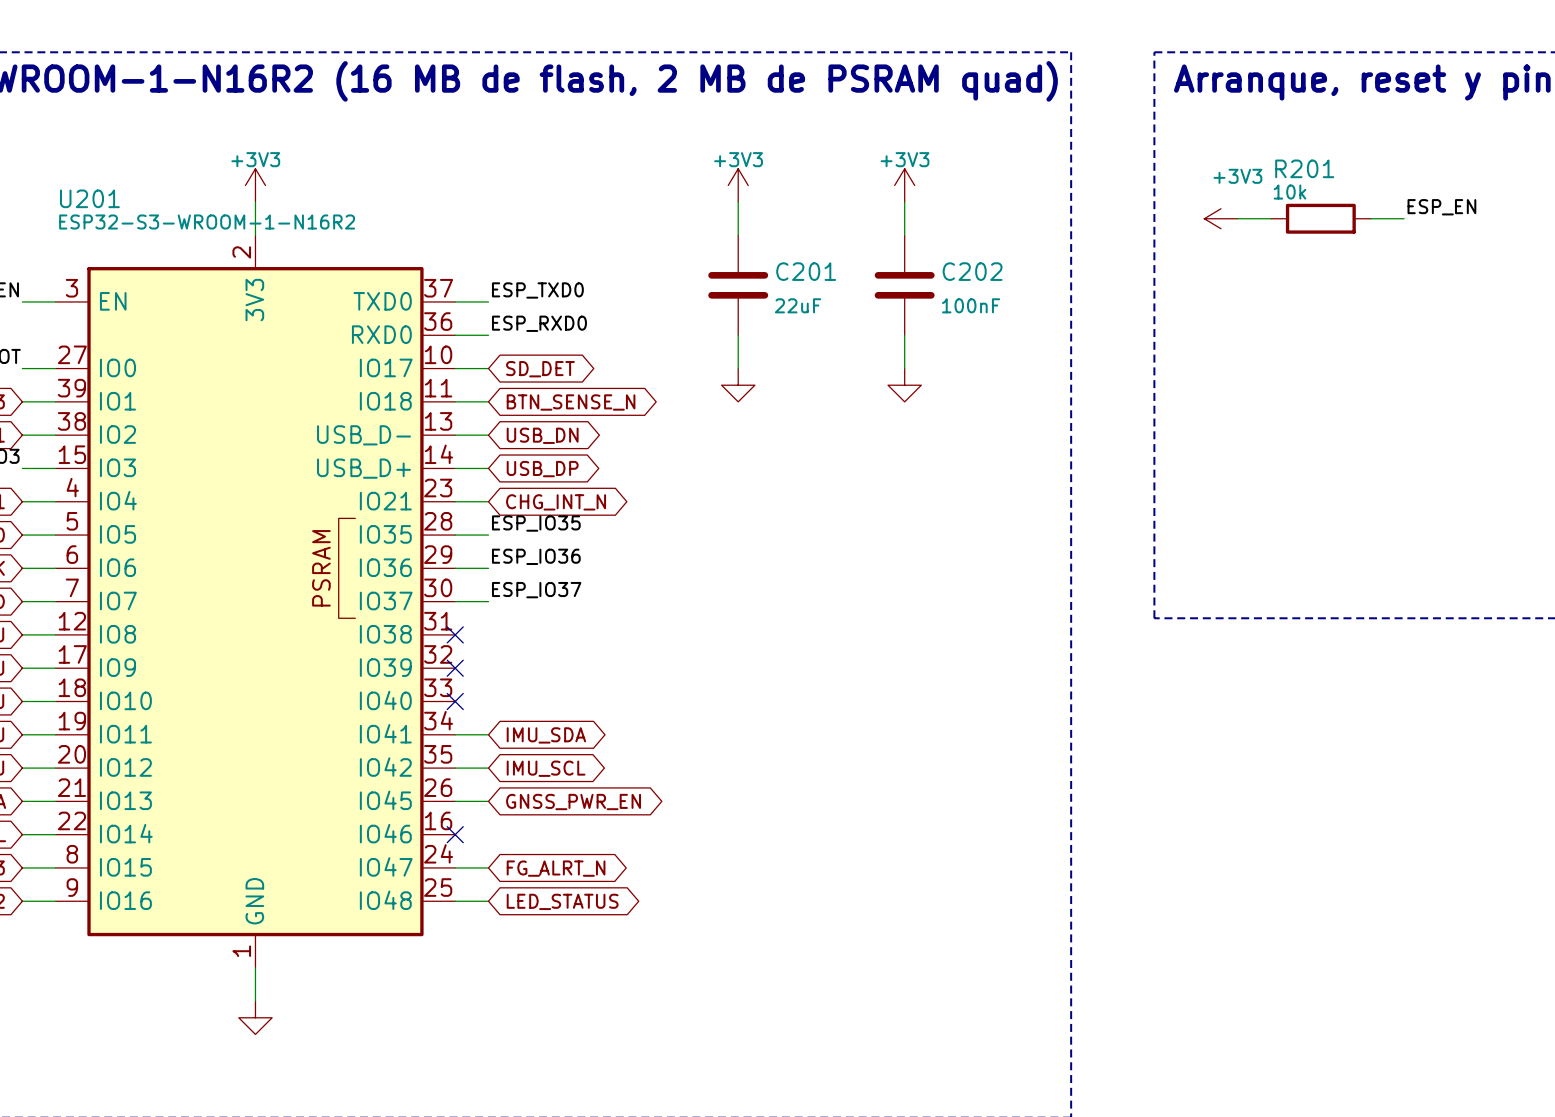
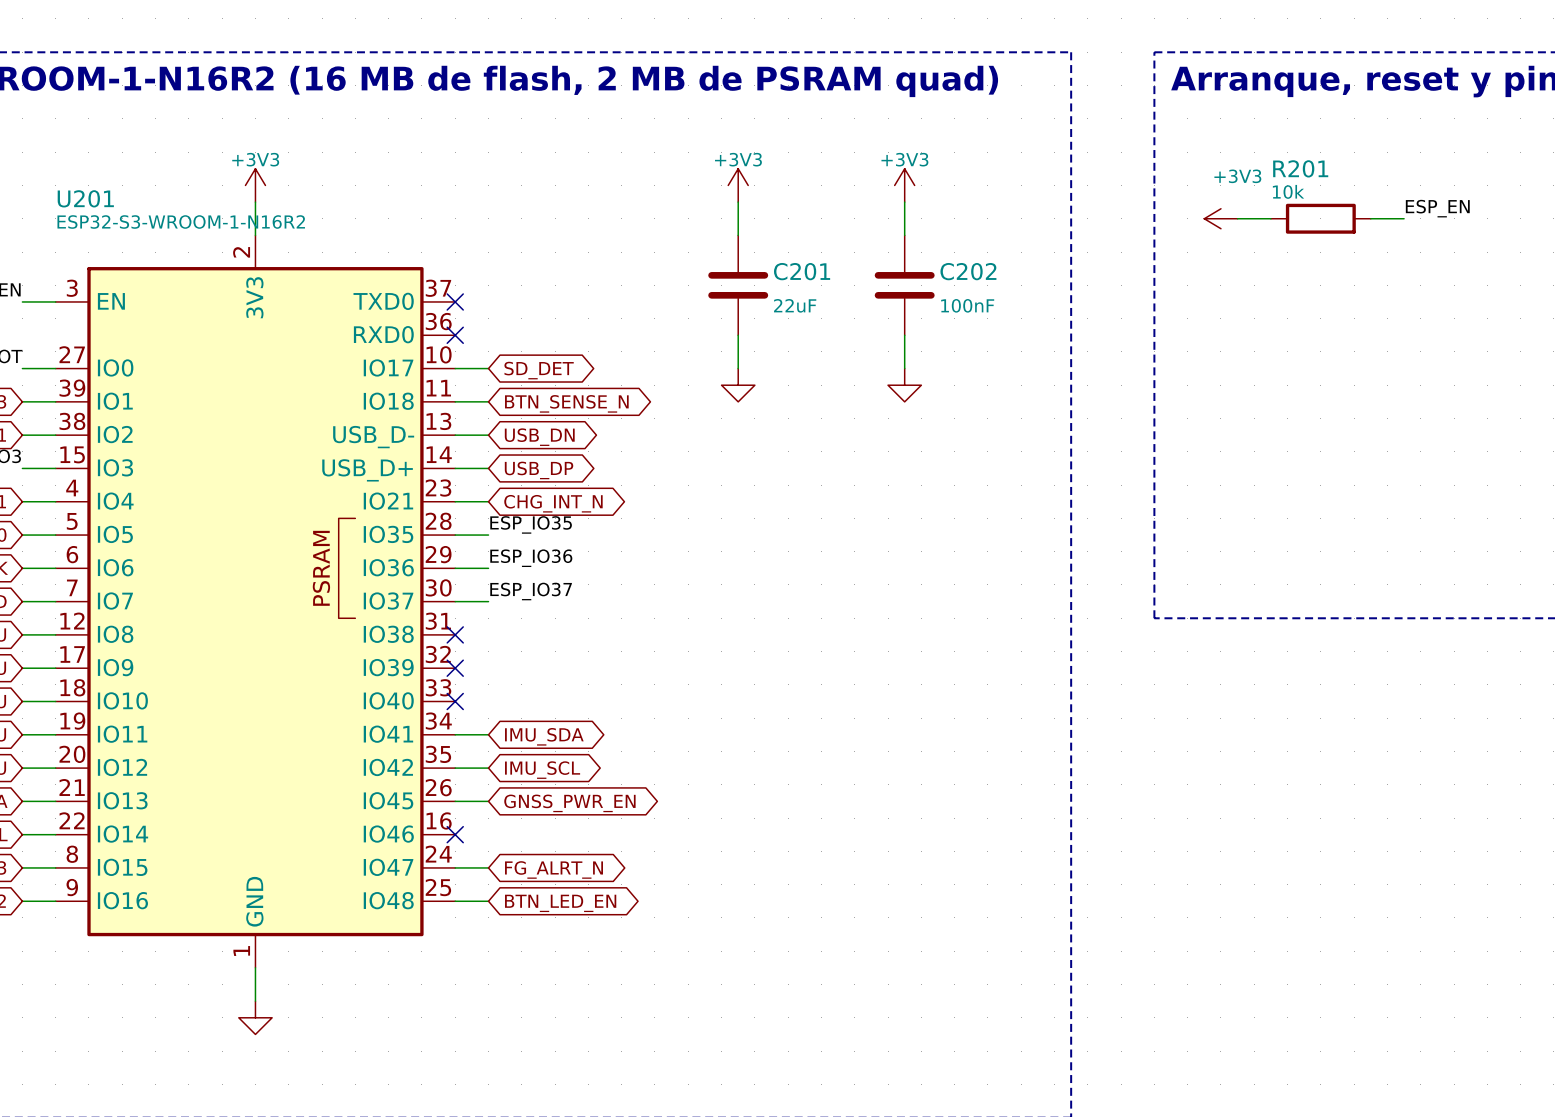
label: ESP_TXD0 (537, 290) -> none
wire: (455, 301) (488, 301) -> none
no-connect mark: none -> (455, 301)
label: ESP_RXD0 (539, 323) -> none
wire: (455, 335) (488, 335) -> none
no-connect mark: none -> (455, 335)
global label: LED_STATUS (562, 901) -> BTN_LED_EN (560, 903)

